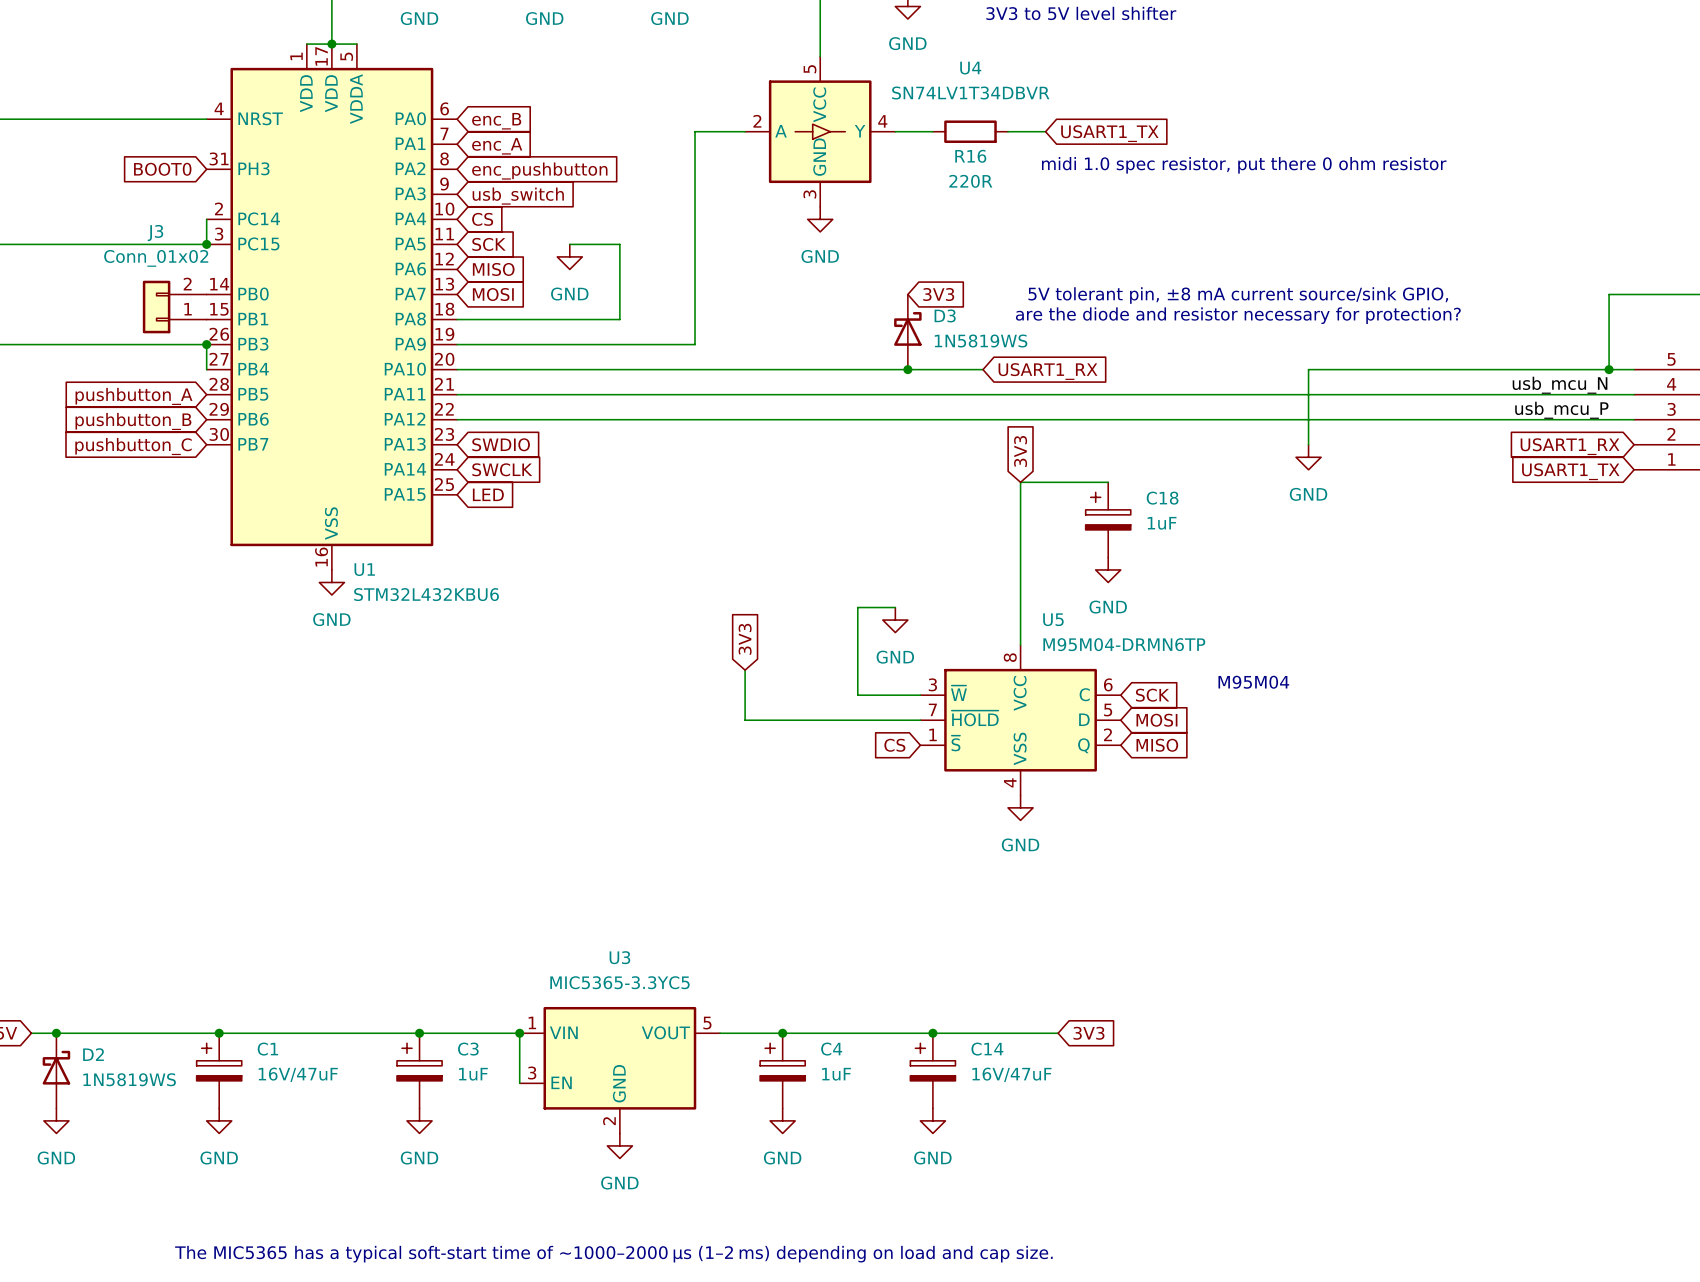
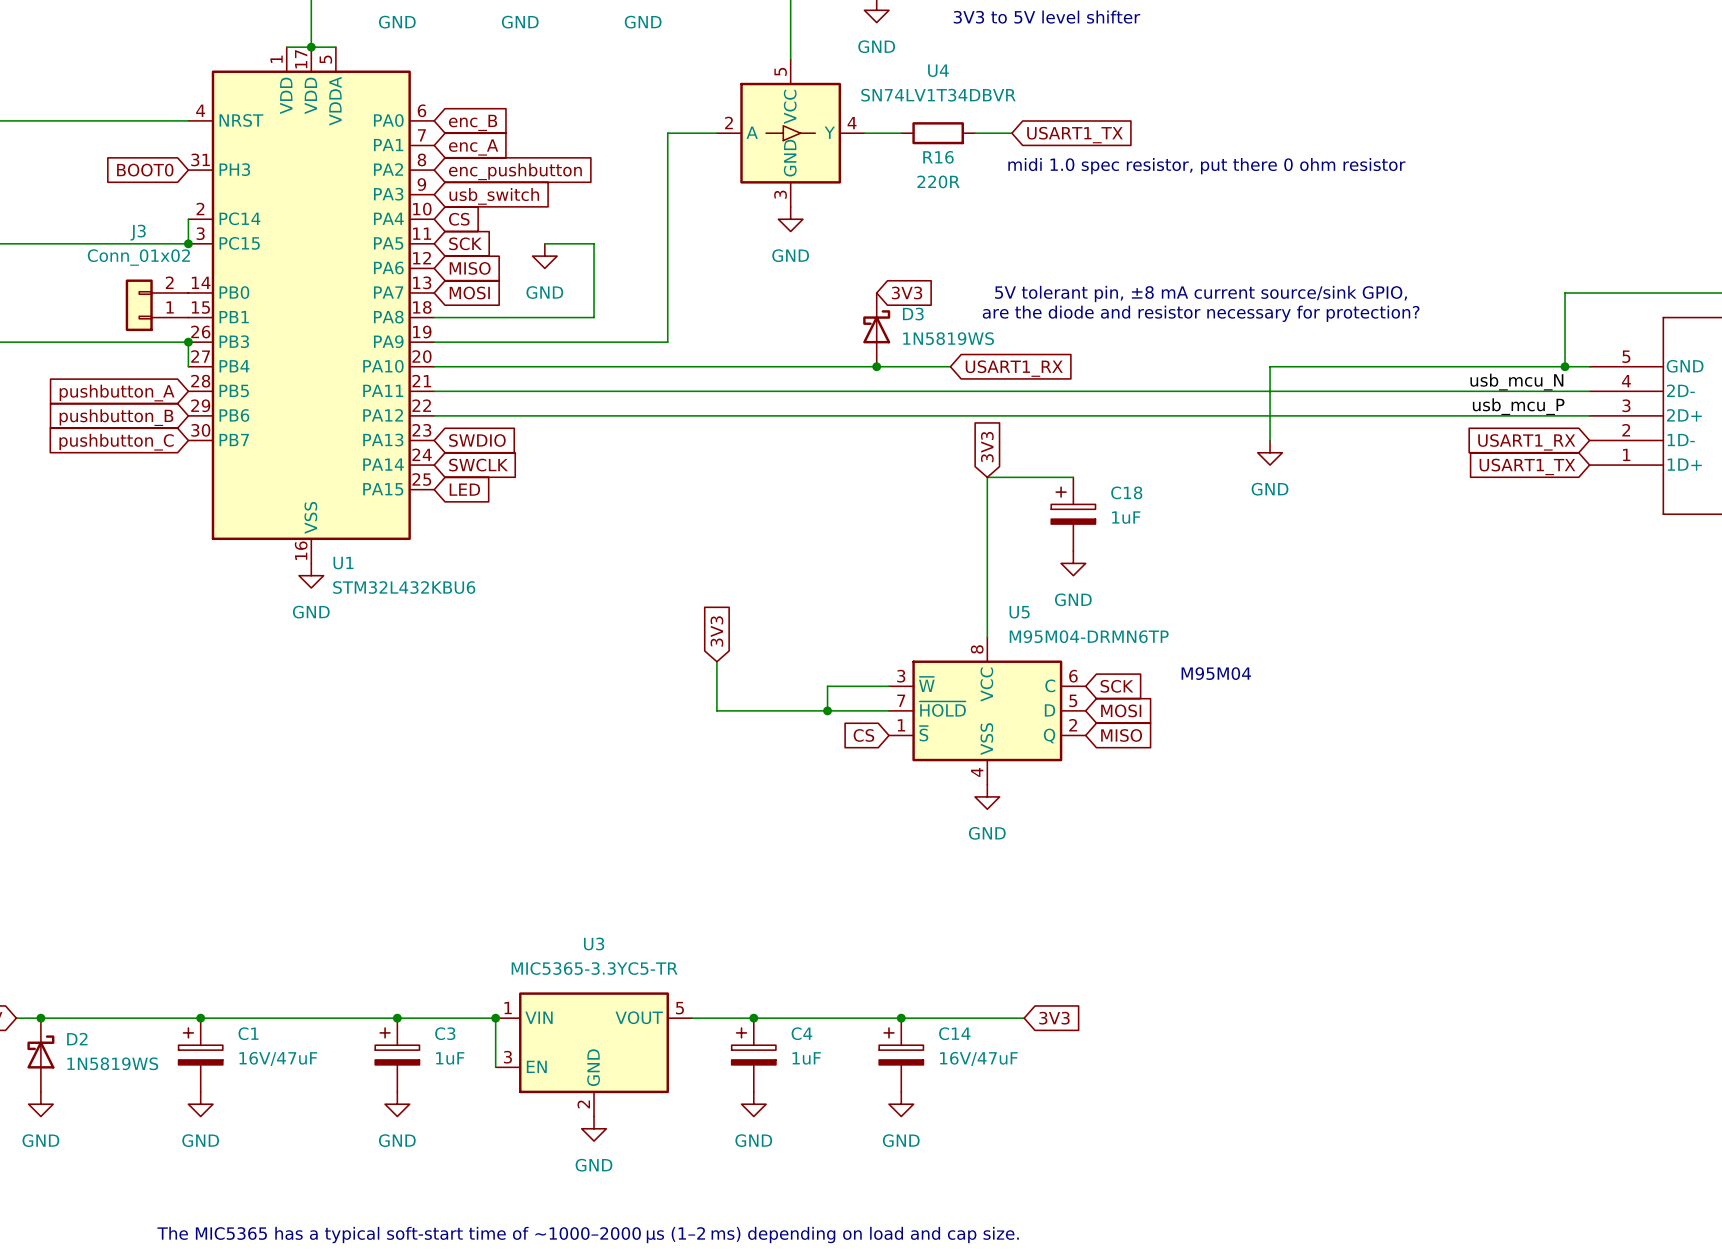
wire: (895, 607) (857, 607) (857, 695) -> (827, 710) (827, 686)
power symbol: GND (895, 620) -> none
junction: none -> (827, 710)
U3 value: MIC5365-3.3YC5 (619, 982) -> MIC5365-3.3YC5-TR (594, 968)

